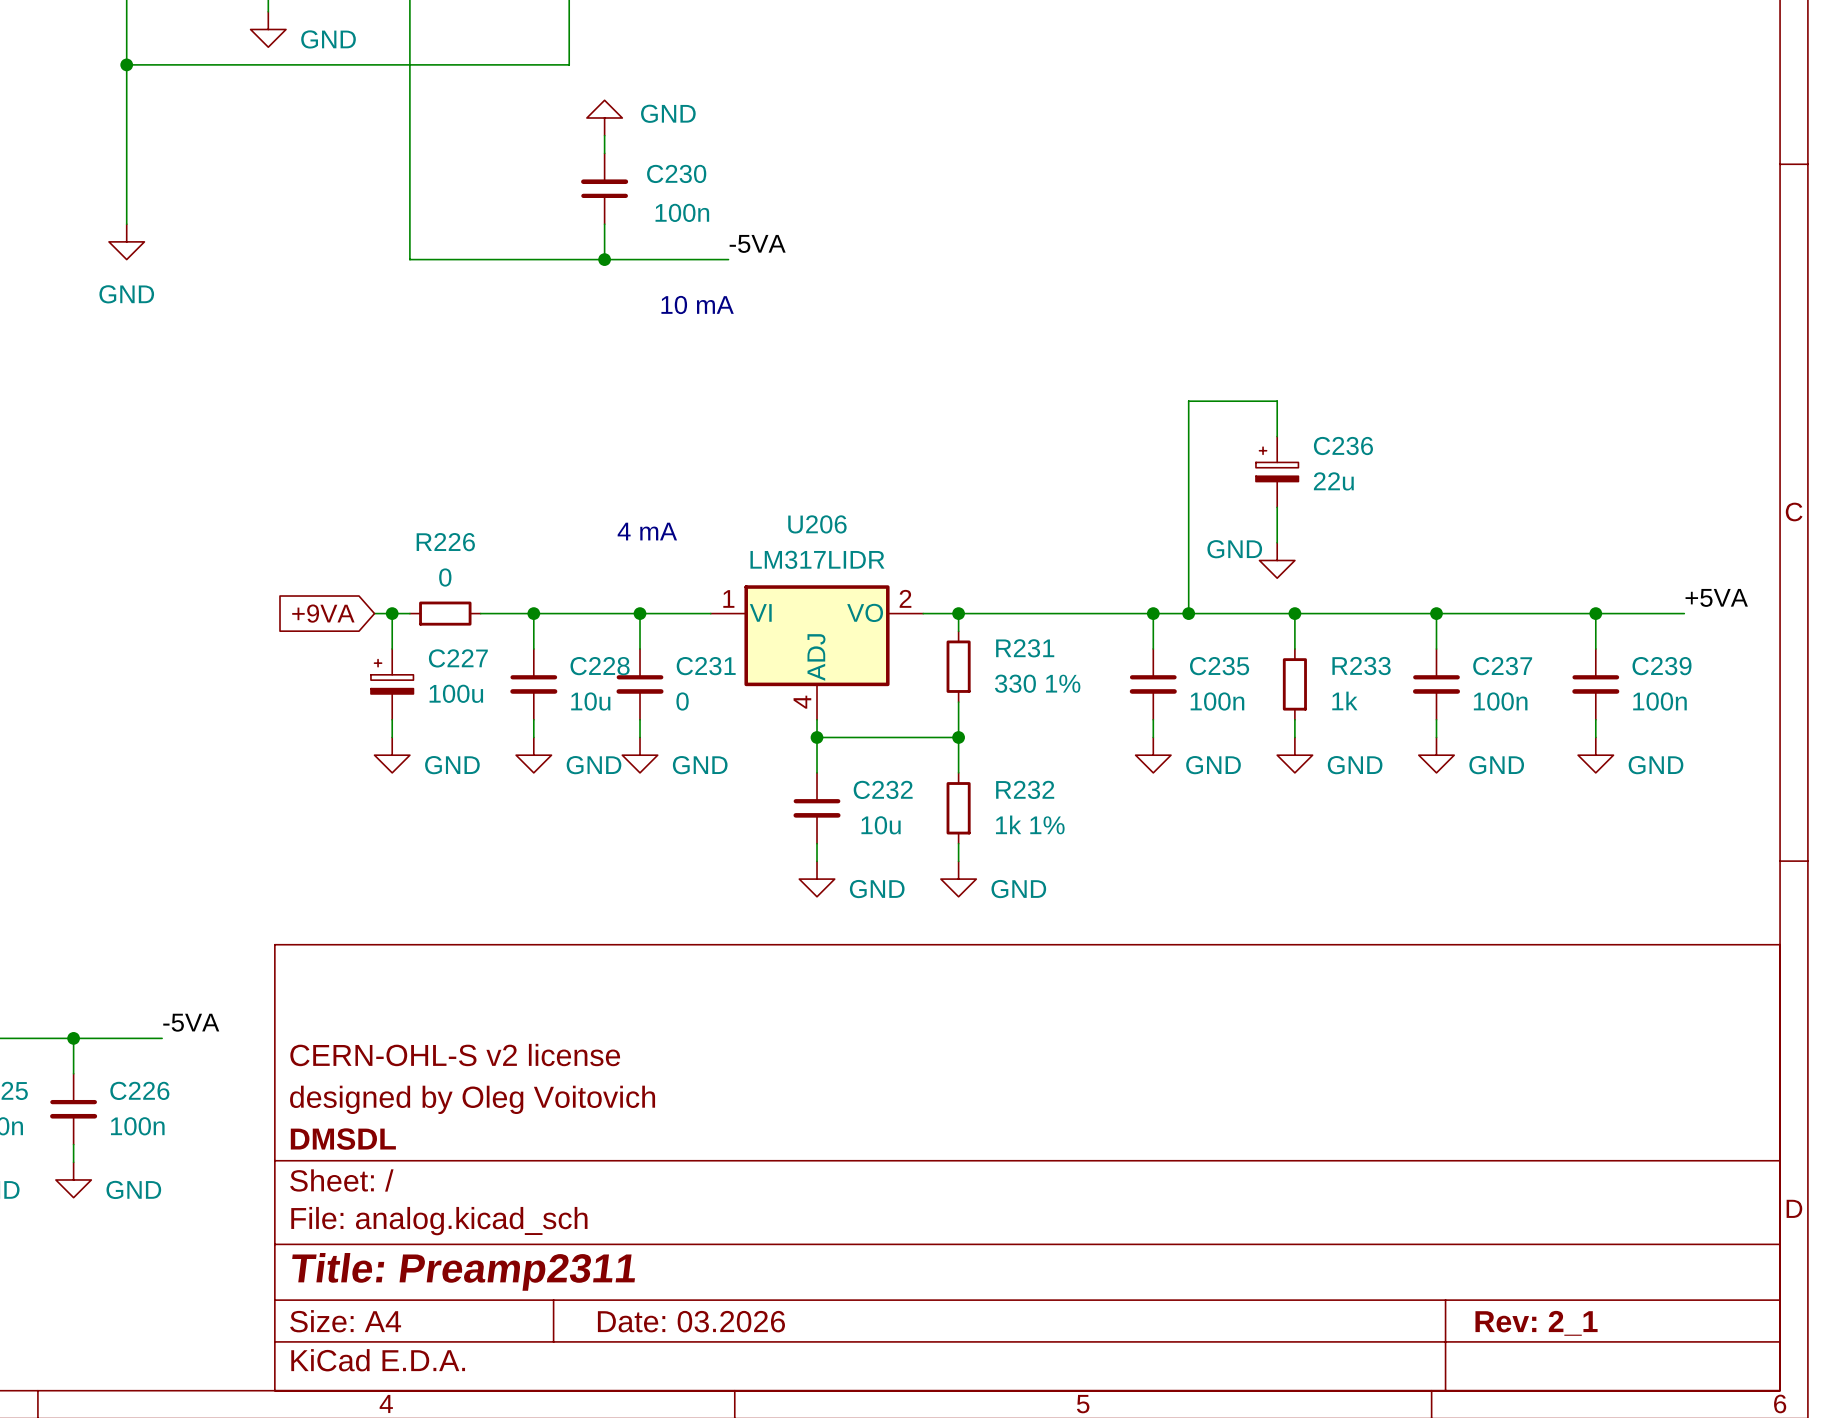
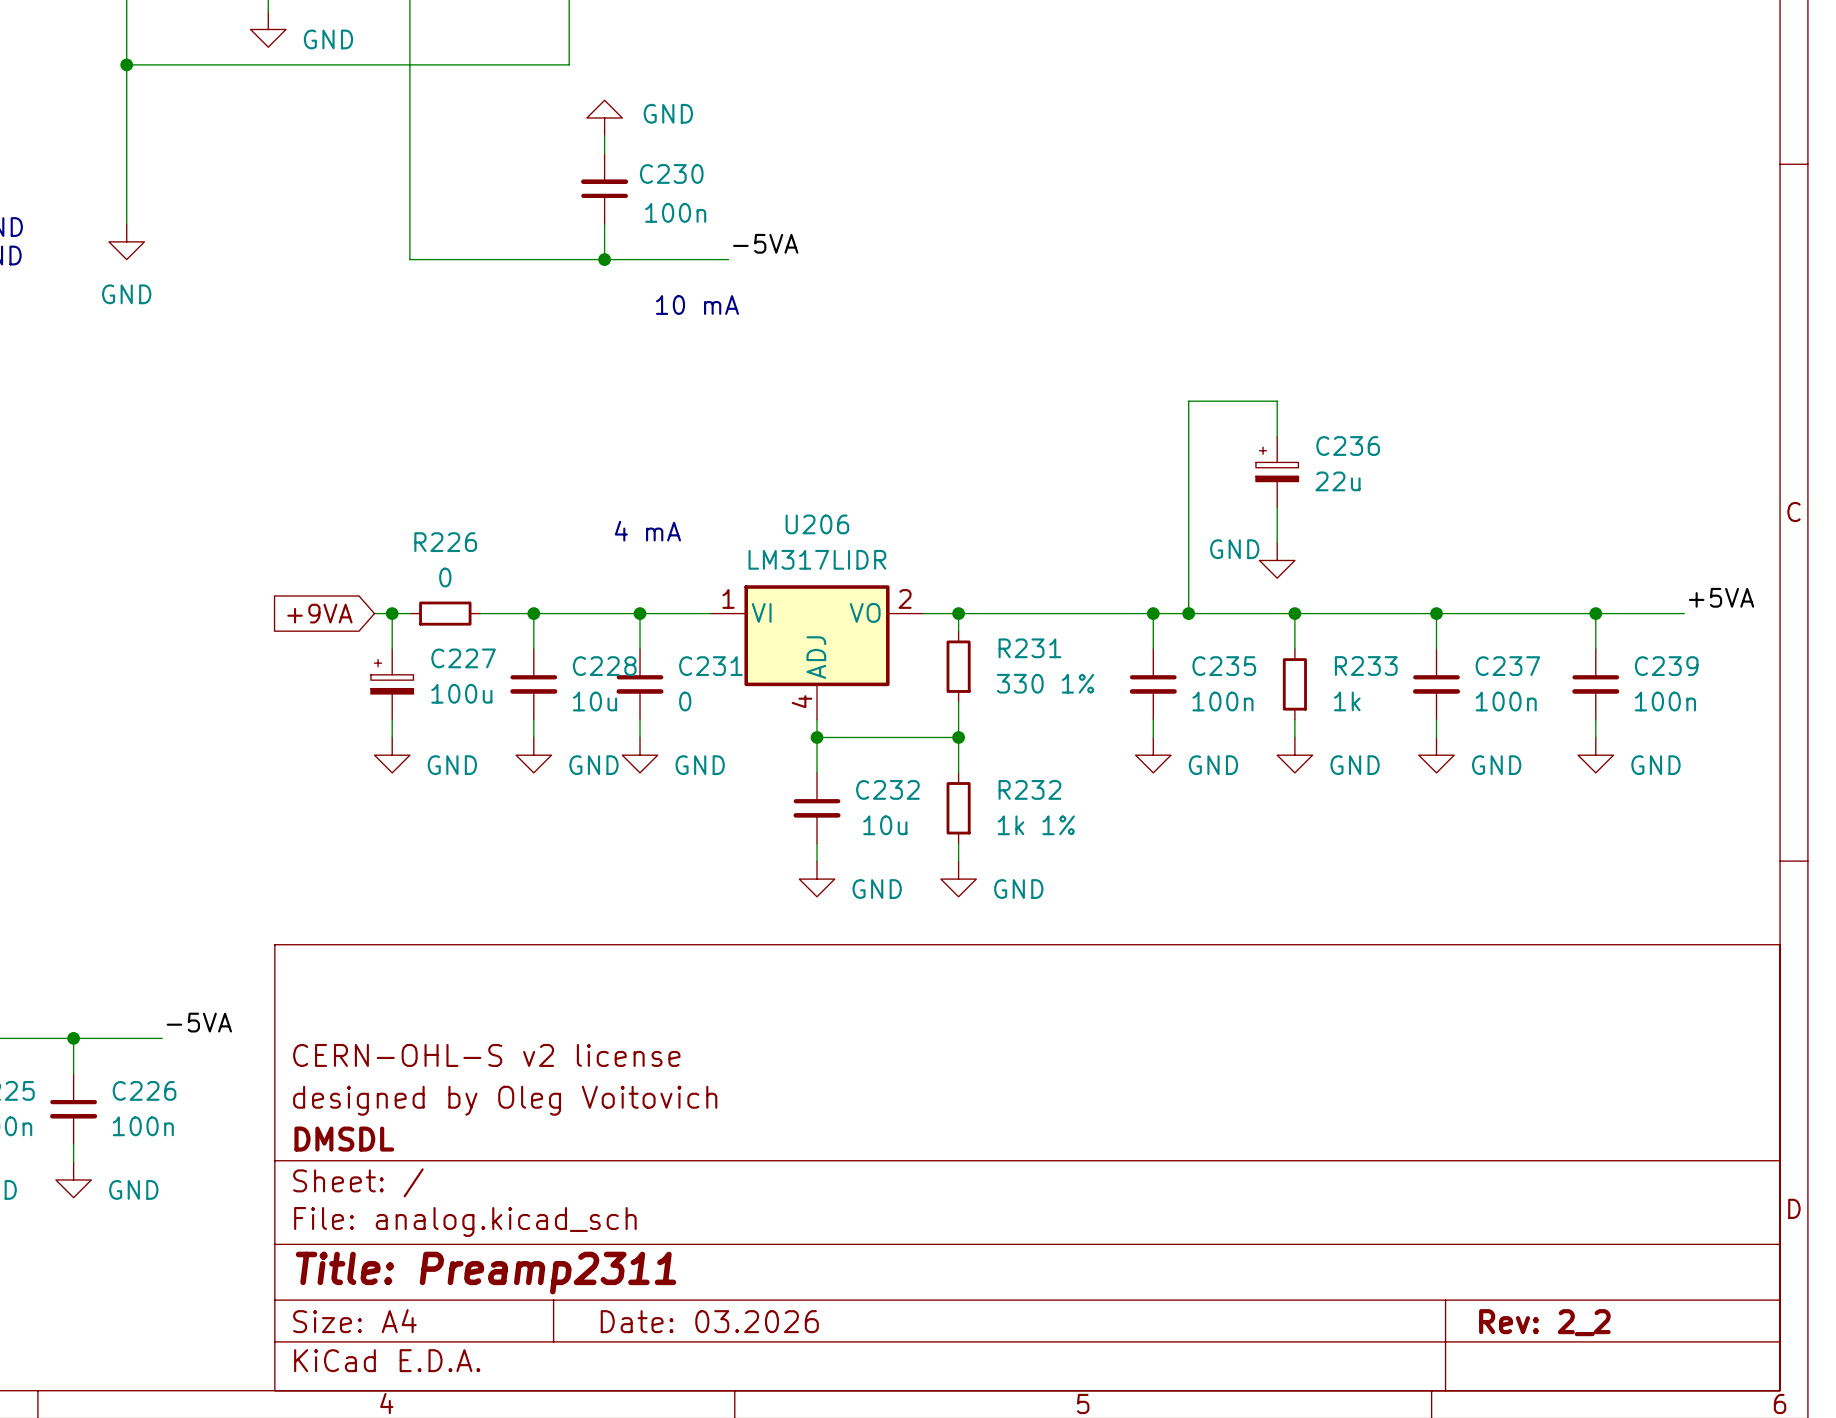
title block: Rev: 2_1 (1536, 1323) -> Rev: 2_2 (1544, 1322)

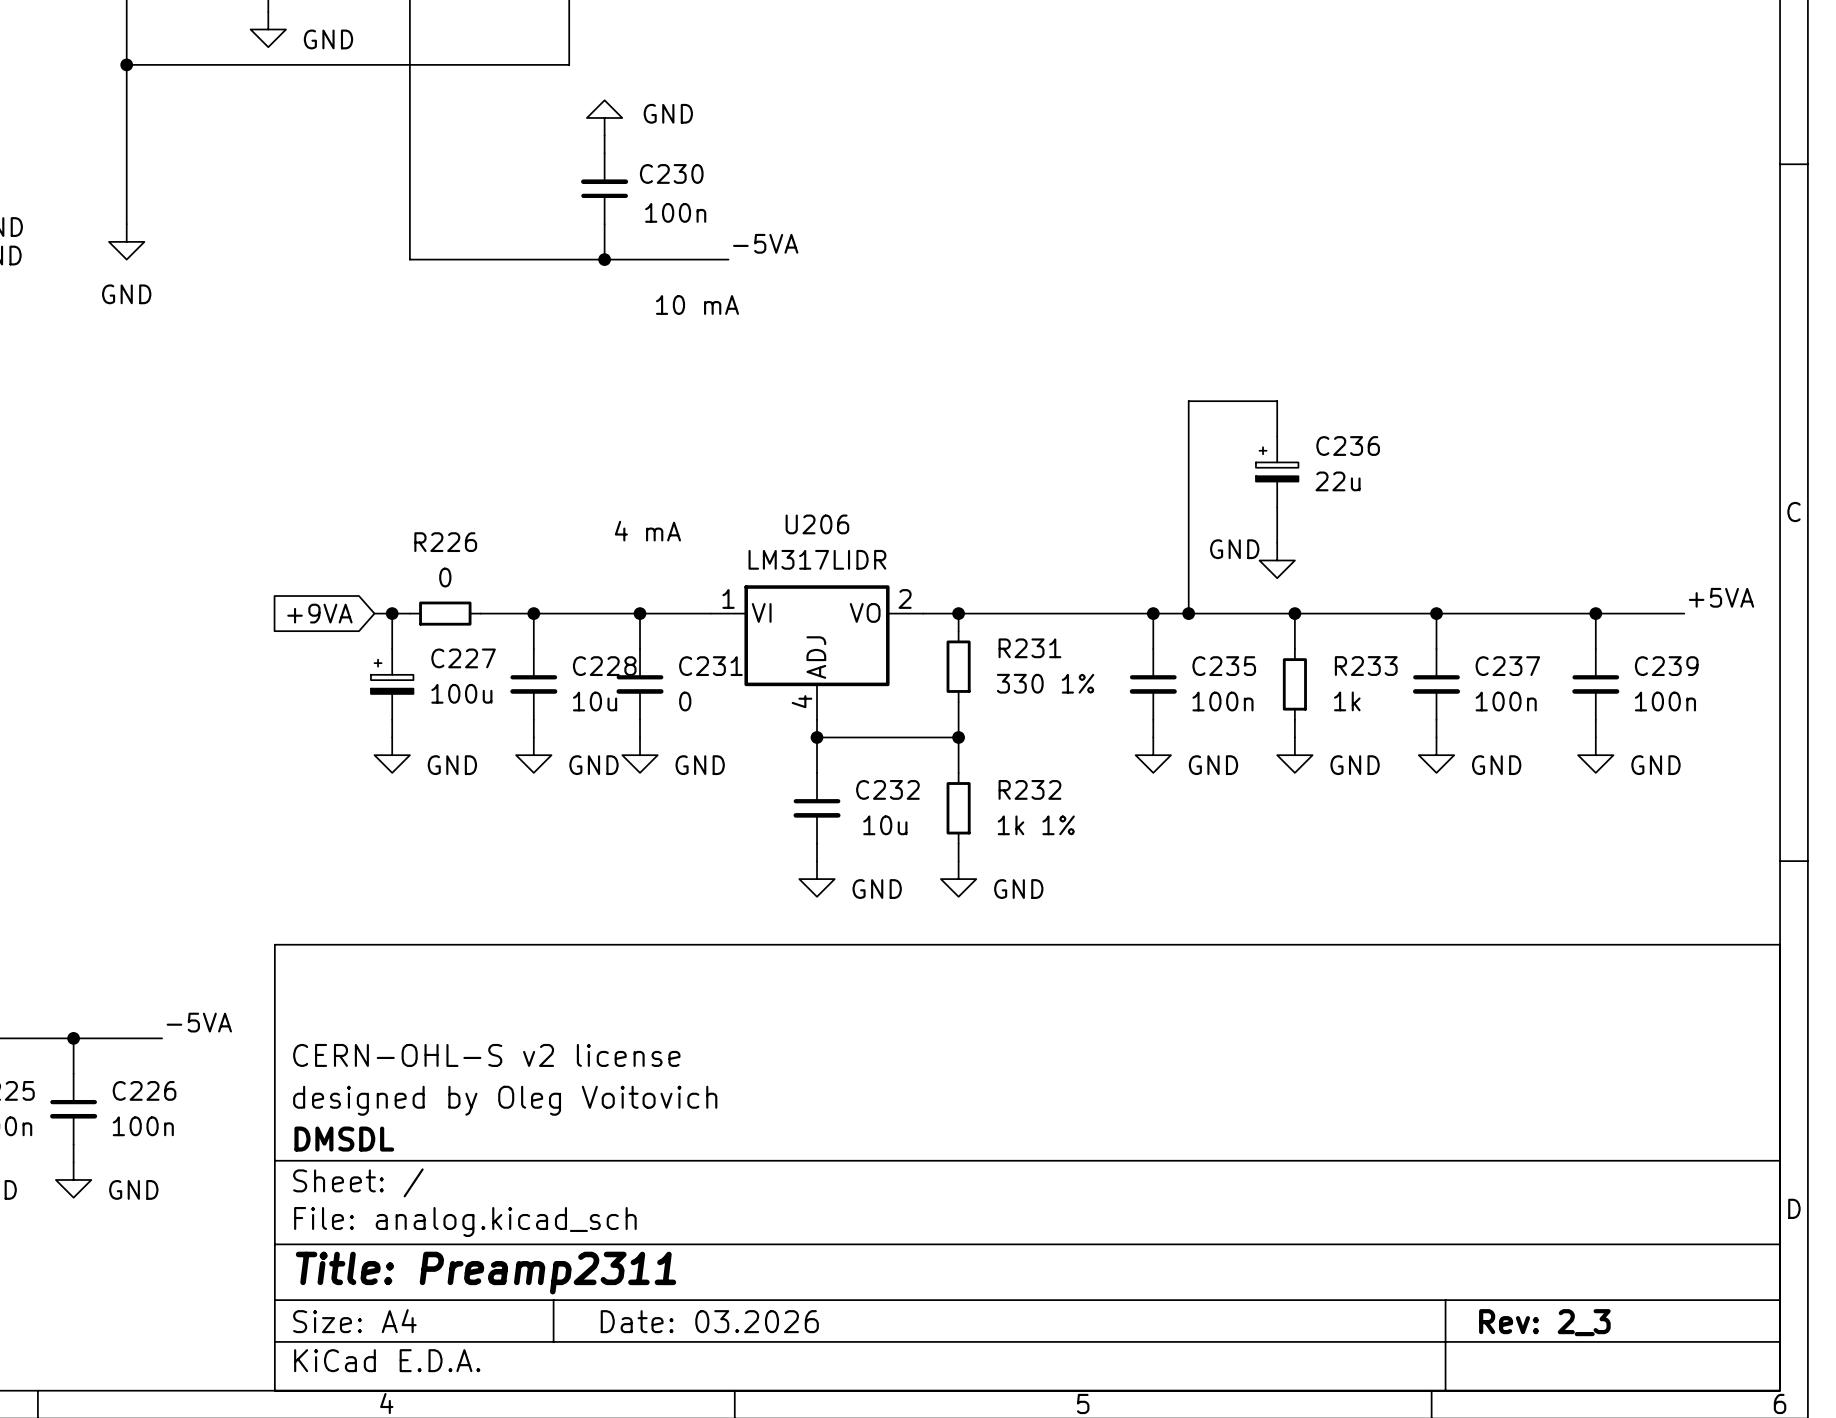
title block: Rev: 2_2 (1544, 1322) -> Rev: 2_3 (1544, 1322)

